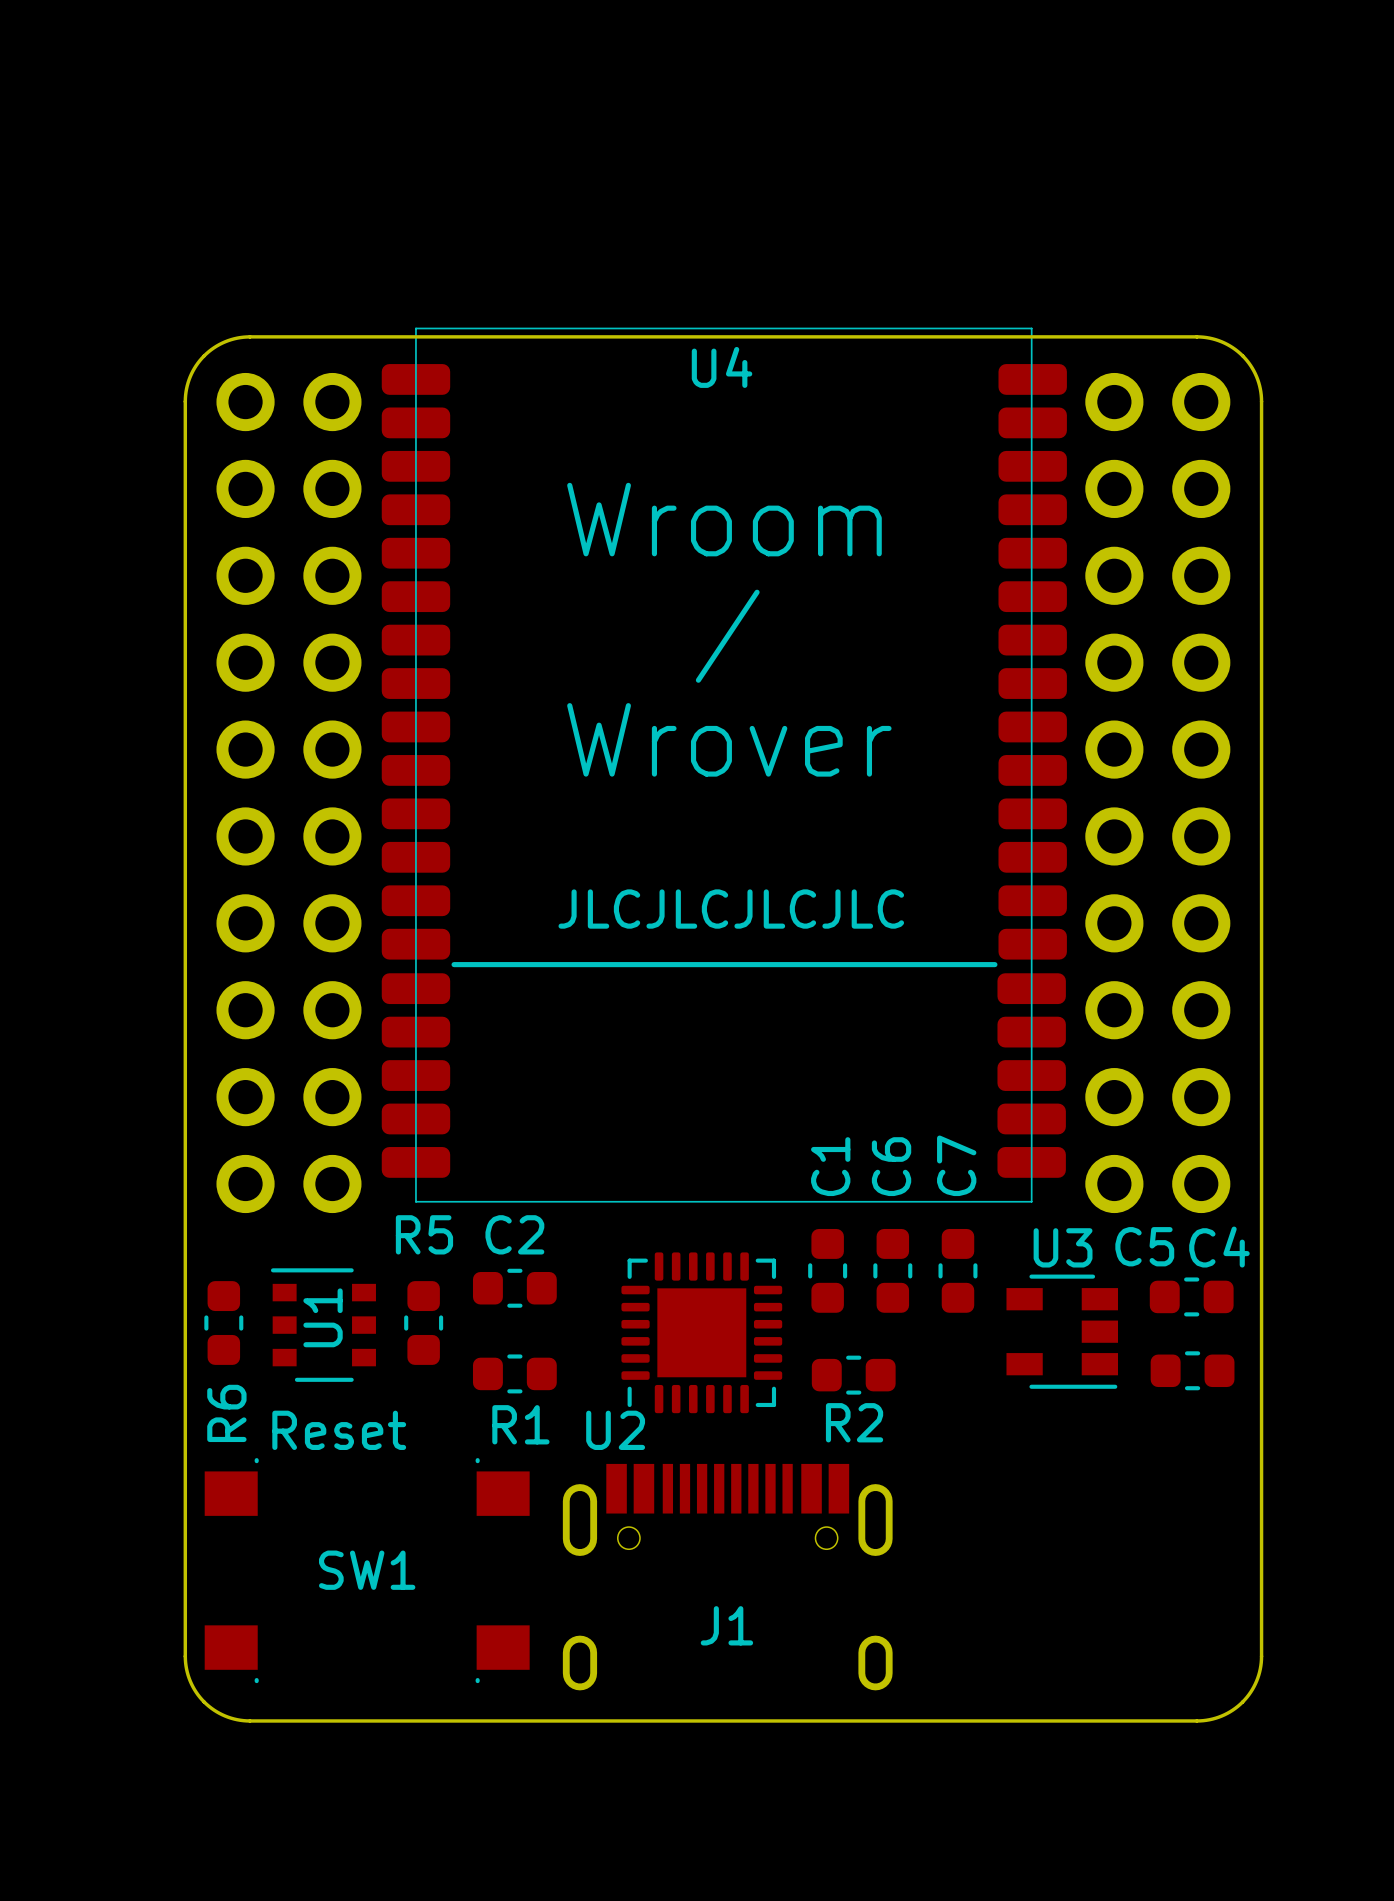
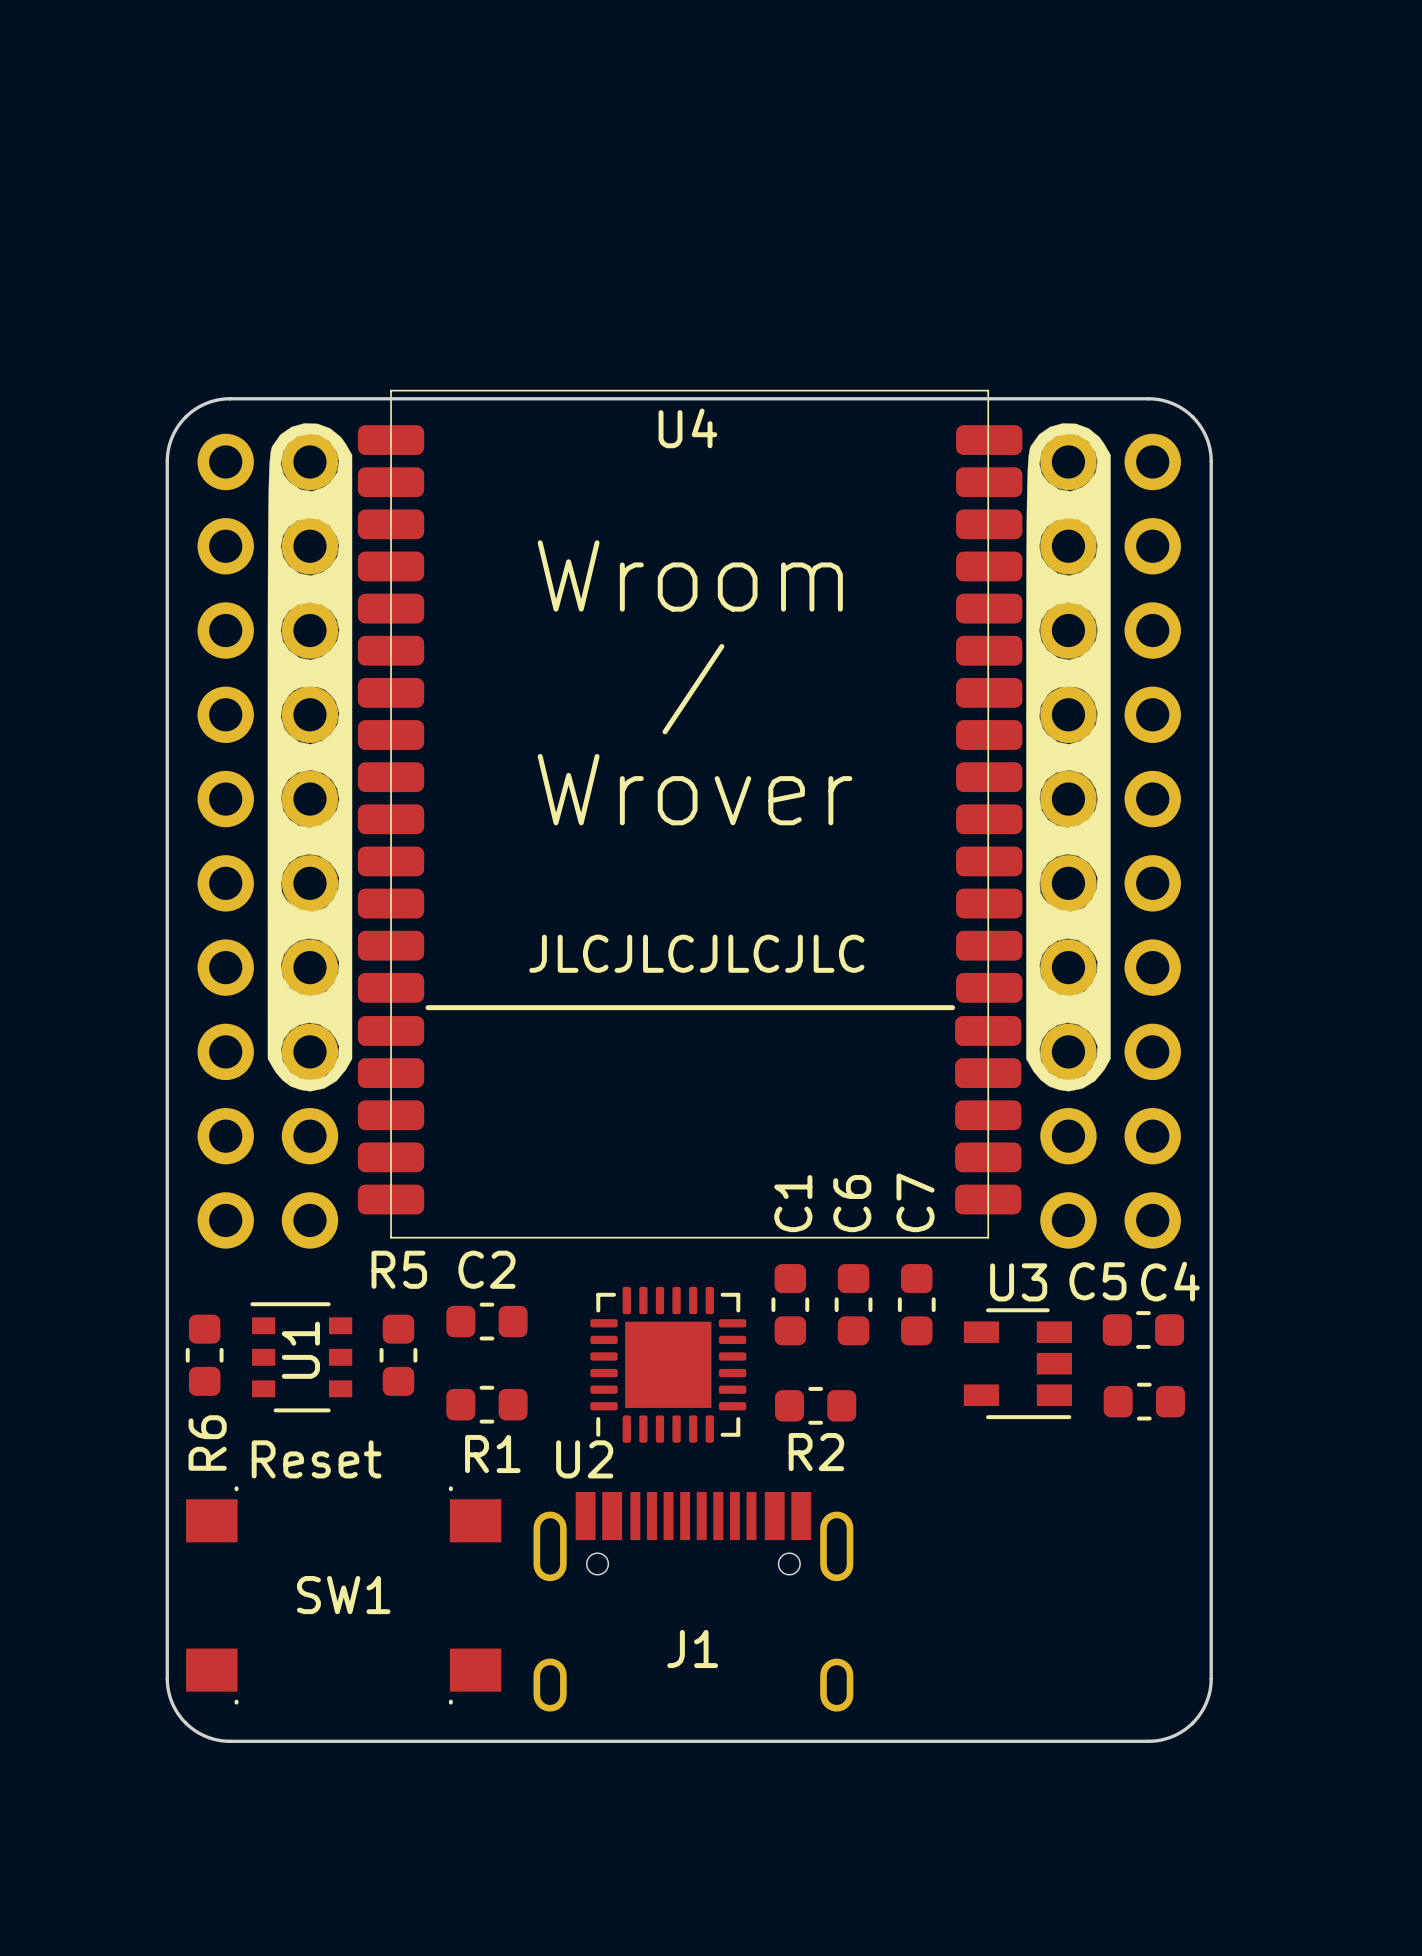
drawing: none -> [267, 423, 353, 1092]
drawing: none -> [1026, 423, 1111, 1092]

